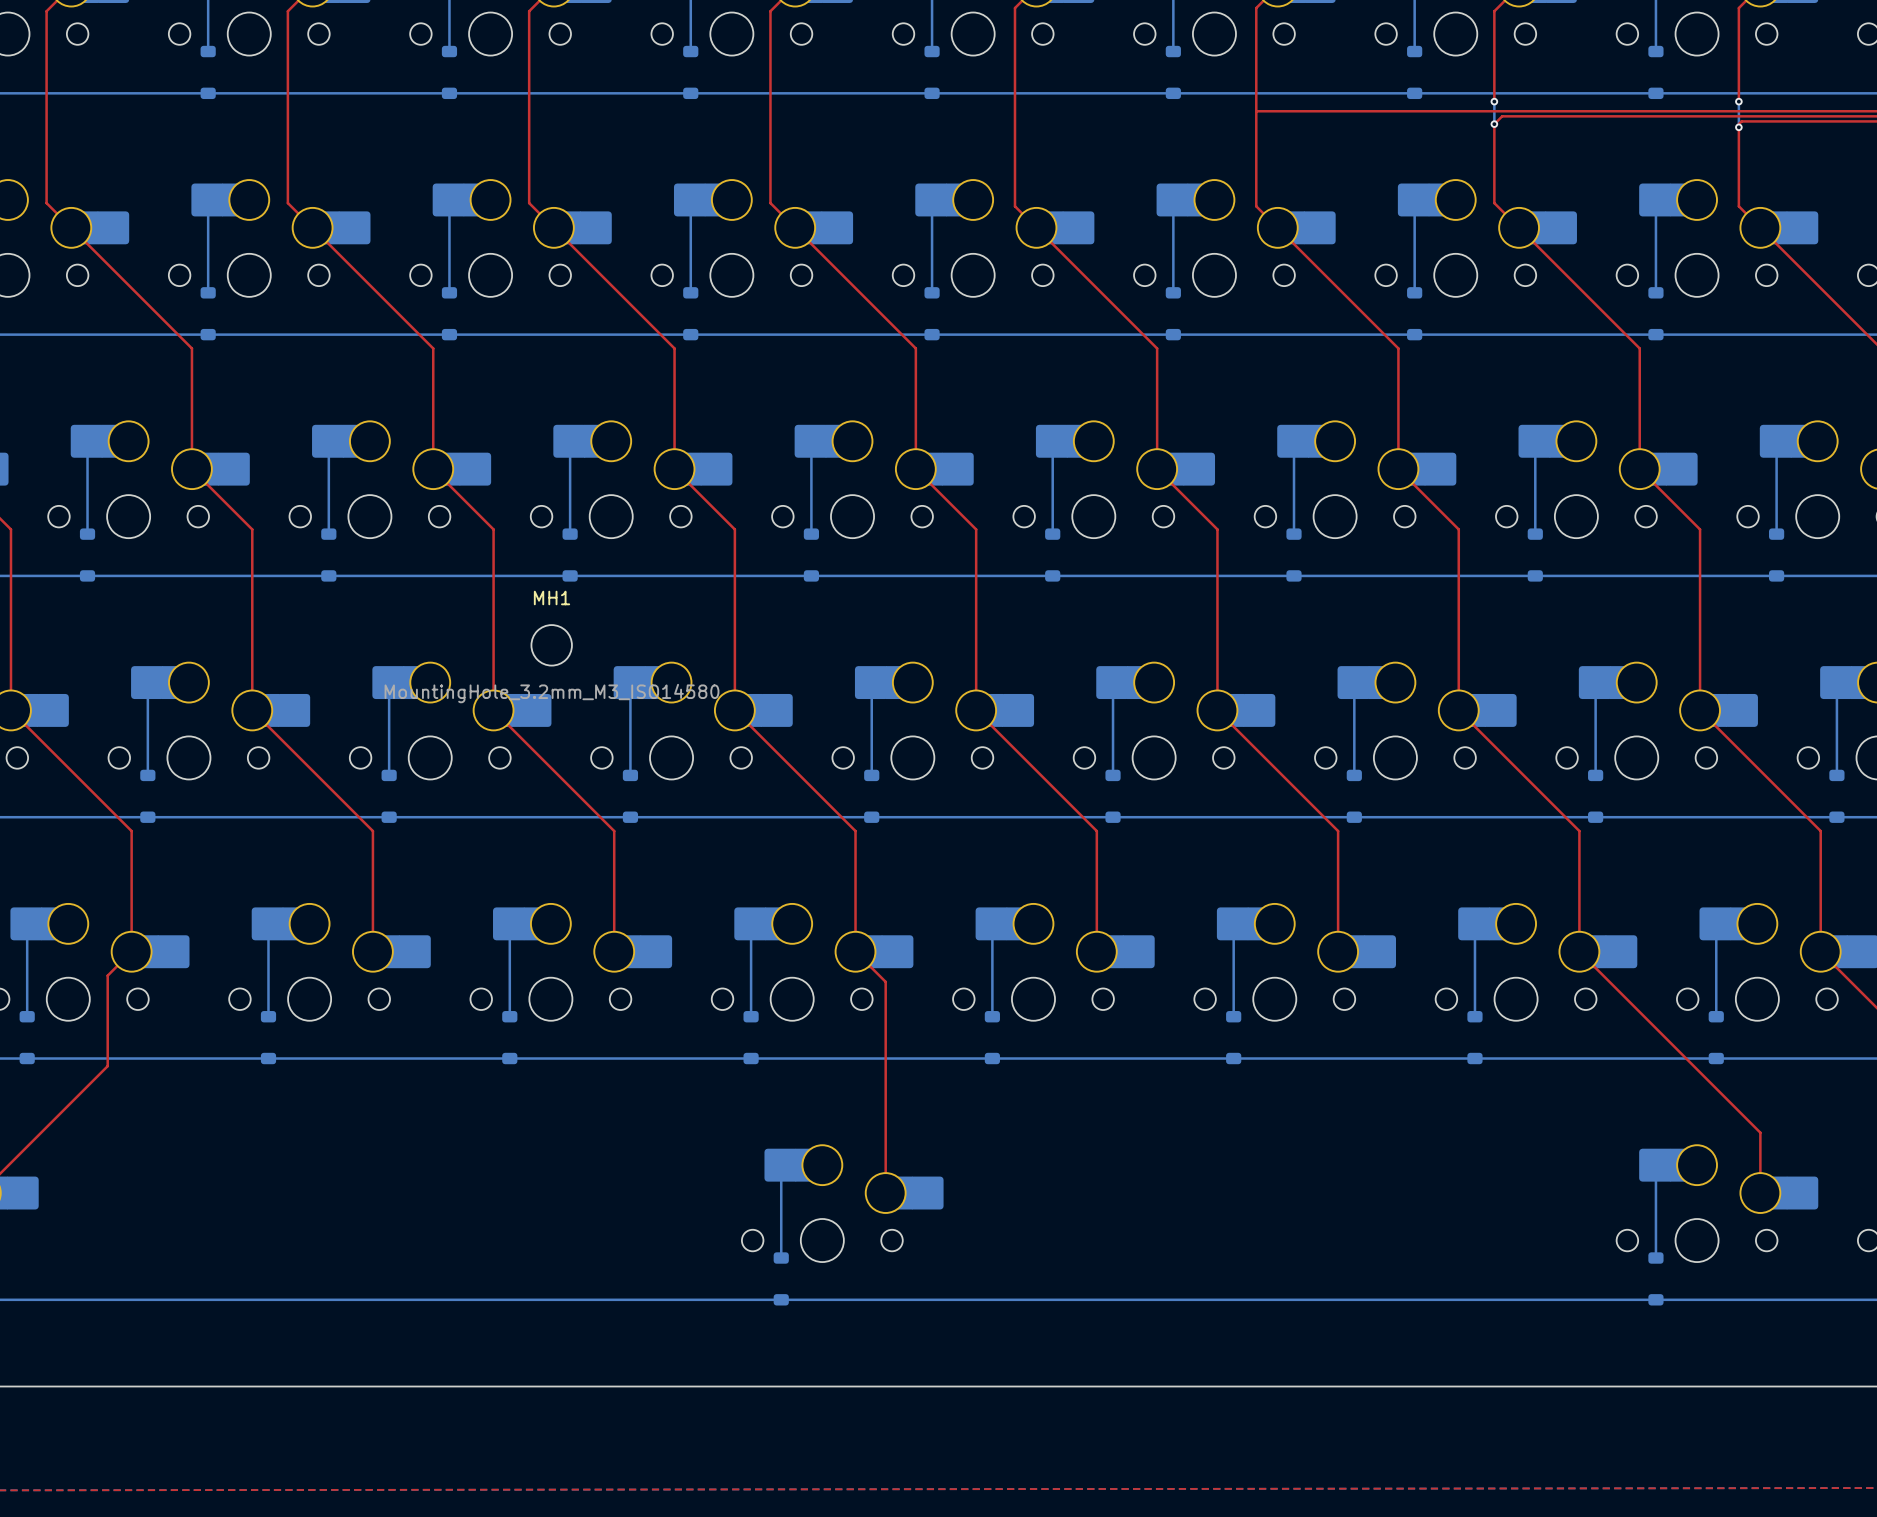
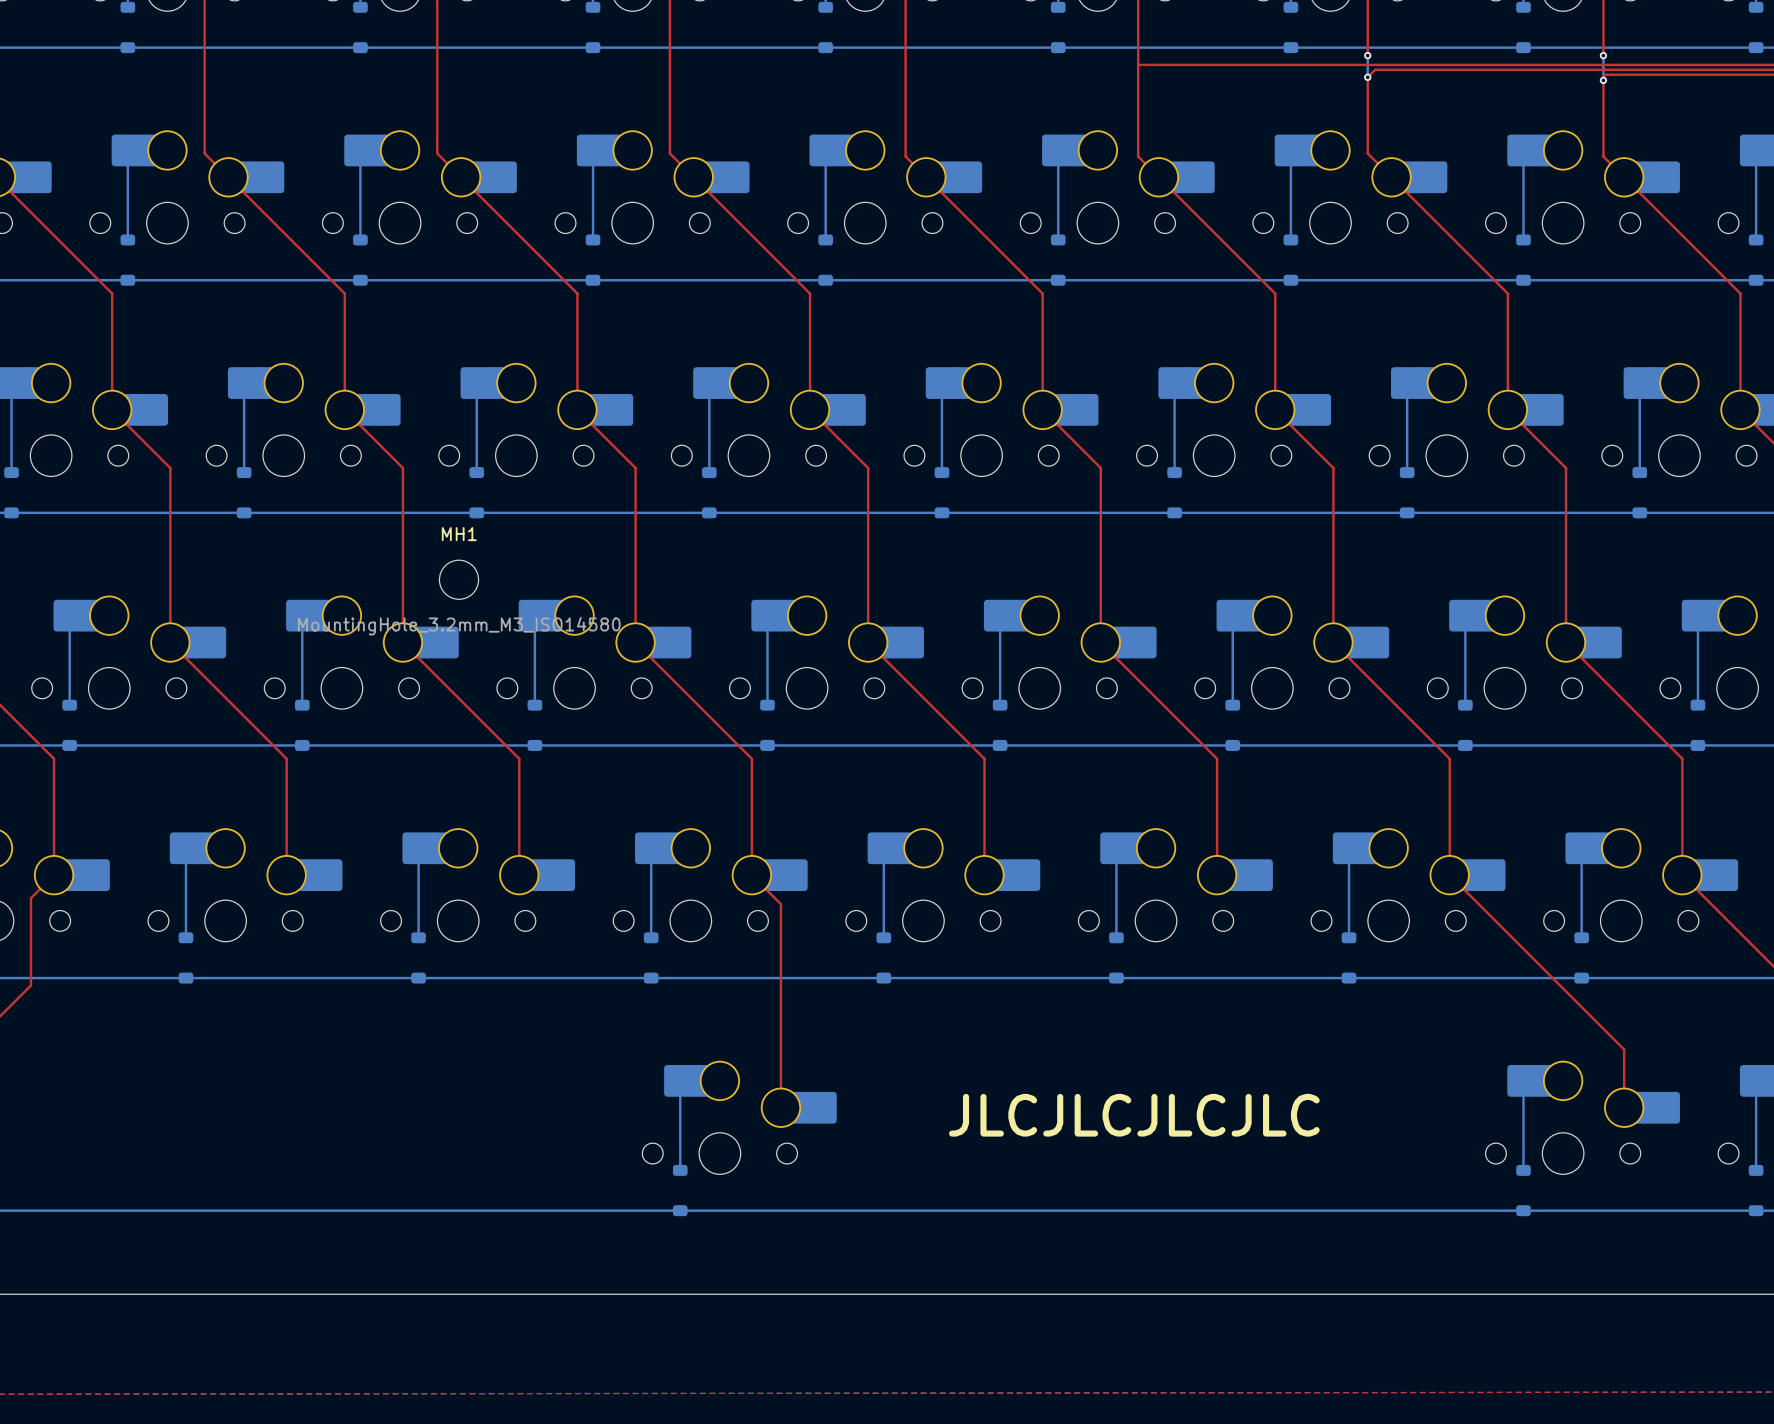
text: none -> JLCJLCJLCJLC (1134, 1115)

